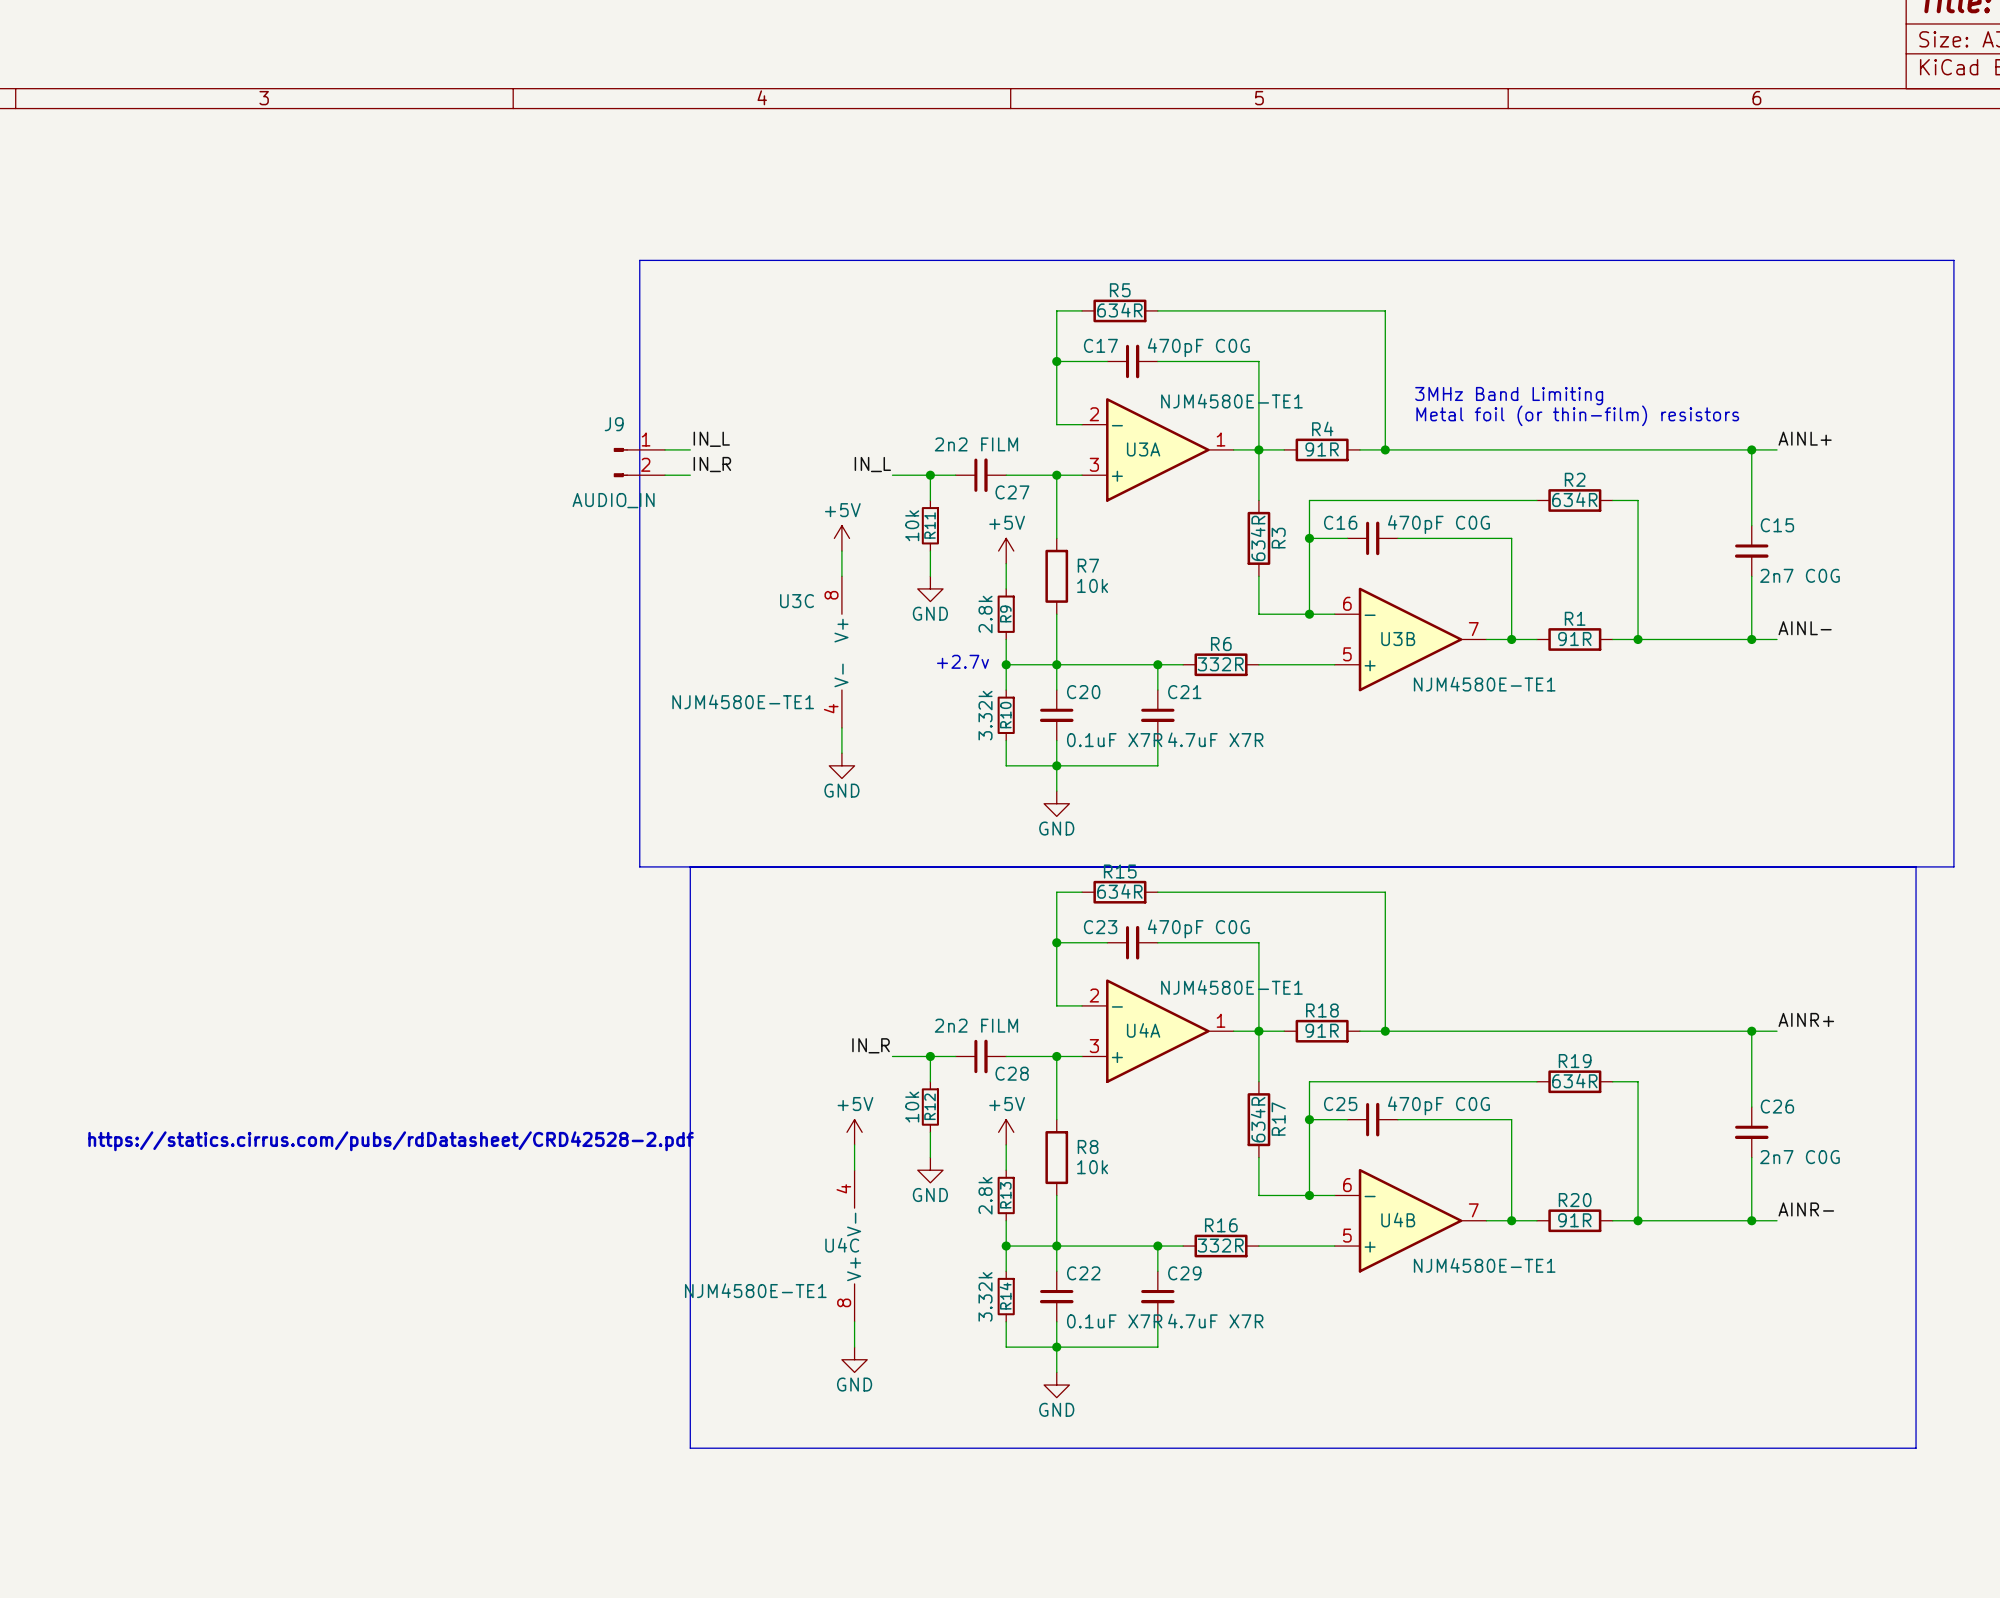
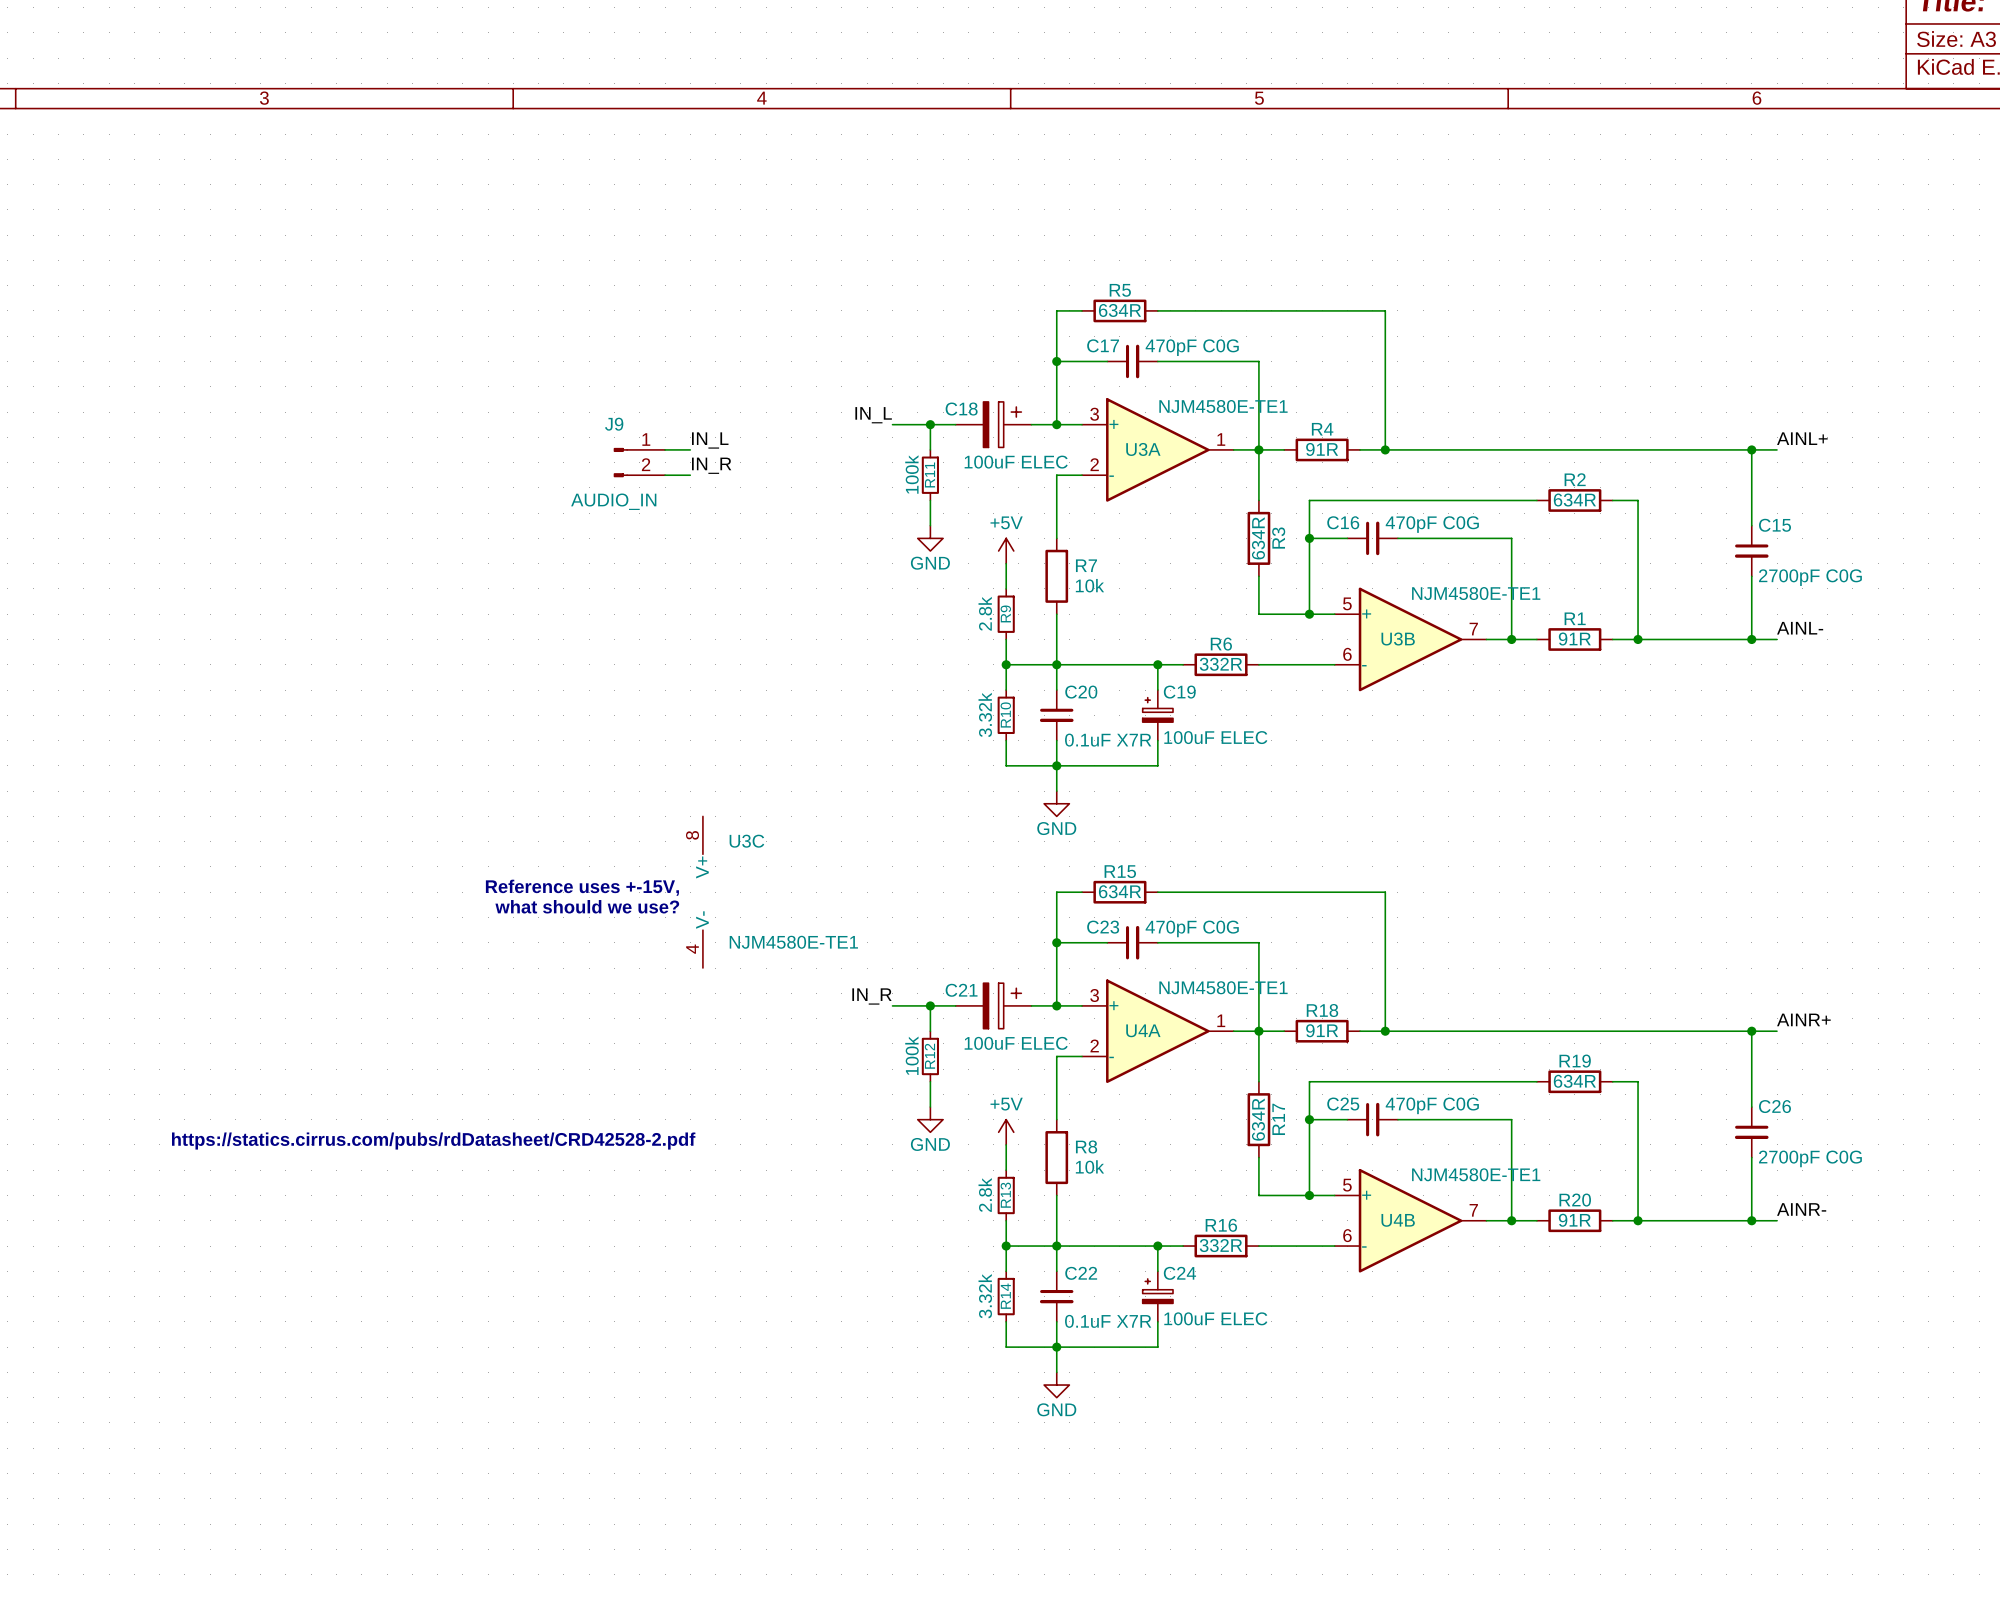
line: (639, 260) (1953, 260) (1953, 866) (639, 866) (639, 260) -> none
text: 3MHz Band Limiting (1509, 396) -> none
text: Metal foil (or thin-film) resistors (1577, 415) -> none
C18: none -> 100uF ELEC (993, 424)
wire: none -> (1031, 424) (1056, 424)
U3A flip: as is (1157, 449) -> up-down (1157, 449)
label position: IN_L (872, 464) -> IN_L (873, 415)
wire: (892, 475) (955, 475) -> (892, 424) (955, 424)
junction position: (930, 475) -> (930, 424)
C27: 2n2 FILM (980, 475) -> none
wire: (1006, 475) (1056, 475) -> none
junction position: (1056, 475) -> (1056, 424)
R11 value: 10k (912, 525) -> 100k (911, 474)
R11 position: (930, 525) -> (930, 475)
power symbol: +5V (841, 538) -> none
wire: (841, 551) (841, 576) -> none
wire: (930, 551) (930, 576) -> (930, 424) (930, 449)
C15 value: 2n7 C0G (1799, 575) -> 2700pF C0G (1810, 577)
power symbol position: GND (930, 588) -> GND (930, 538)
U3C name position: U3C (797, 601) -> U3C (746, 841)
U3B flip: as is (1410, 639) -> up-down (1410, 639)
U3C position: (841, 652) -> (702, 892)
text: +2.7v (962, 661) -> none
C21 symbol: [1141, 690, 1175, 741] -> [955, 983, 1032, 1029]
C21 name position: C21 (1184, 692) -> C21 (961, 990)
U3C value position: NJM4580E-TE1 (743, 701) -> NJM4580E-TE1 (793, 942)
C19: none -> 100uF ELEC (1157, 715)
wire: (841, 727) (841, 753) -> none
C21 value: 4.7uF X7R (1215, 739) -> 100uF ELEC (1016, 1043)
power symbol: GND (841, 765) -> none
line: (690, 866) (690, 1448) (1916, 1448) (1916, 866) -> none
text: none -> Reference uses +-15V, (582, 887)
text: none -> what should we use? (587, 906)
wire: none -> (1031, 1005) (1056, 1005)
U4A flip: as is (1157, 1031) -> up-down (1157, 1031)
label position: IN_R (871, 1045) -> IN_R (871, 996)
wire: (892, 1056) (955, 1056) -> (892, 1005) (955, 1005)
junction position: (930, 1056) -> (930, 1005)
C28: 2n2 FILM (980, 1056) -> none
wire: (1006, 1056) (1056, 1056) -> none
junction position: (1056, 1056) -> (1056, 1005)
R12 value: 10k (912, 1107) -> 100k (911, 1055)
R12 position: (930, 1107) -> (930, 1056)
power symbol: +5V (854, 1132) -> none
wire: (930, 1132) (930, 1157) -> (930, 1005) (930, 1031)
wire: (854, 1144) (854, 1170) -> none
C26 value: 2n7 C0G (1799, 1157) -> 2700pF C0G (1810, 1158)
power symbol position: GND (930, 1170) -> GND (930, 1119)
U4B flip: as is (1410, 1220) -> up-down (1410, 1220)
U4C: NJM4580E-TE1 (854, 1246) -> none
C29: 4.7uF X7R (1157, 1296) -> none
C24: none -> 100uF ELEC (1157, 1296)
wire: (854, 1321) (854, 1347) -> none
power symbol: GND (854, 1359) -> none

